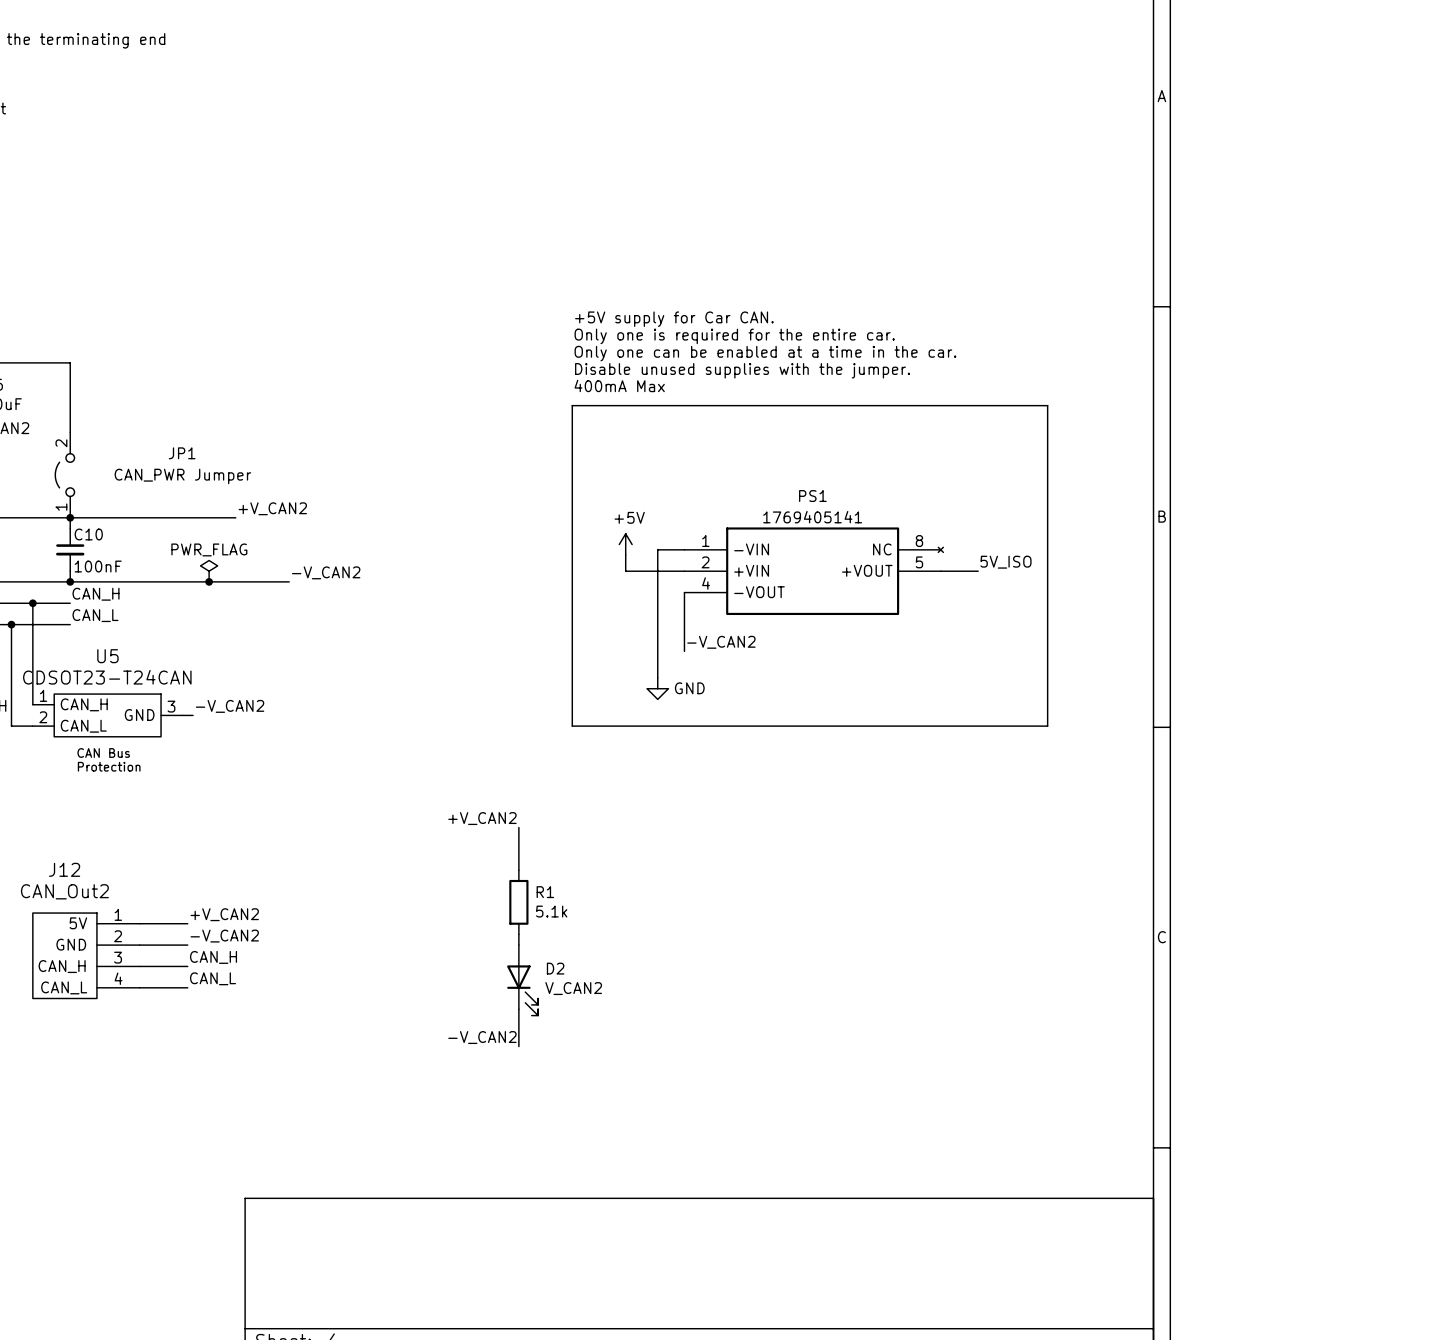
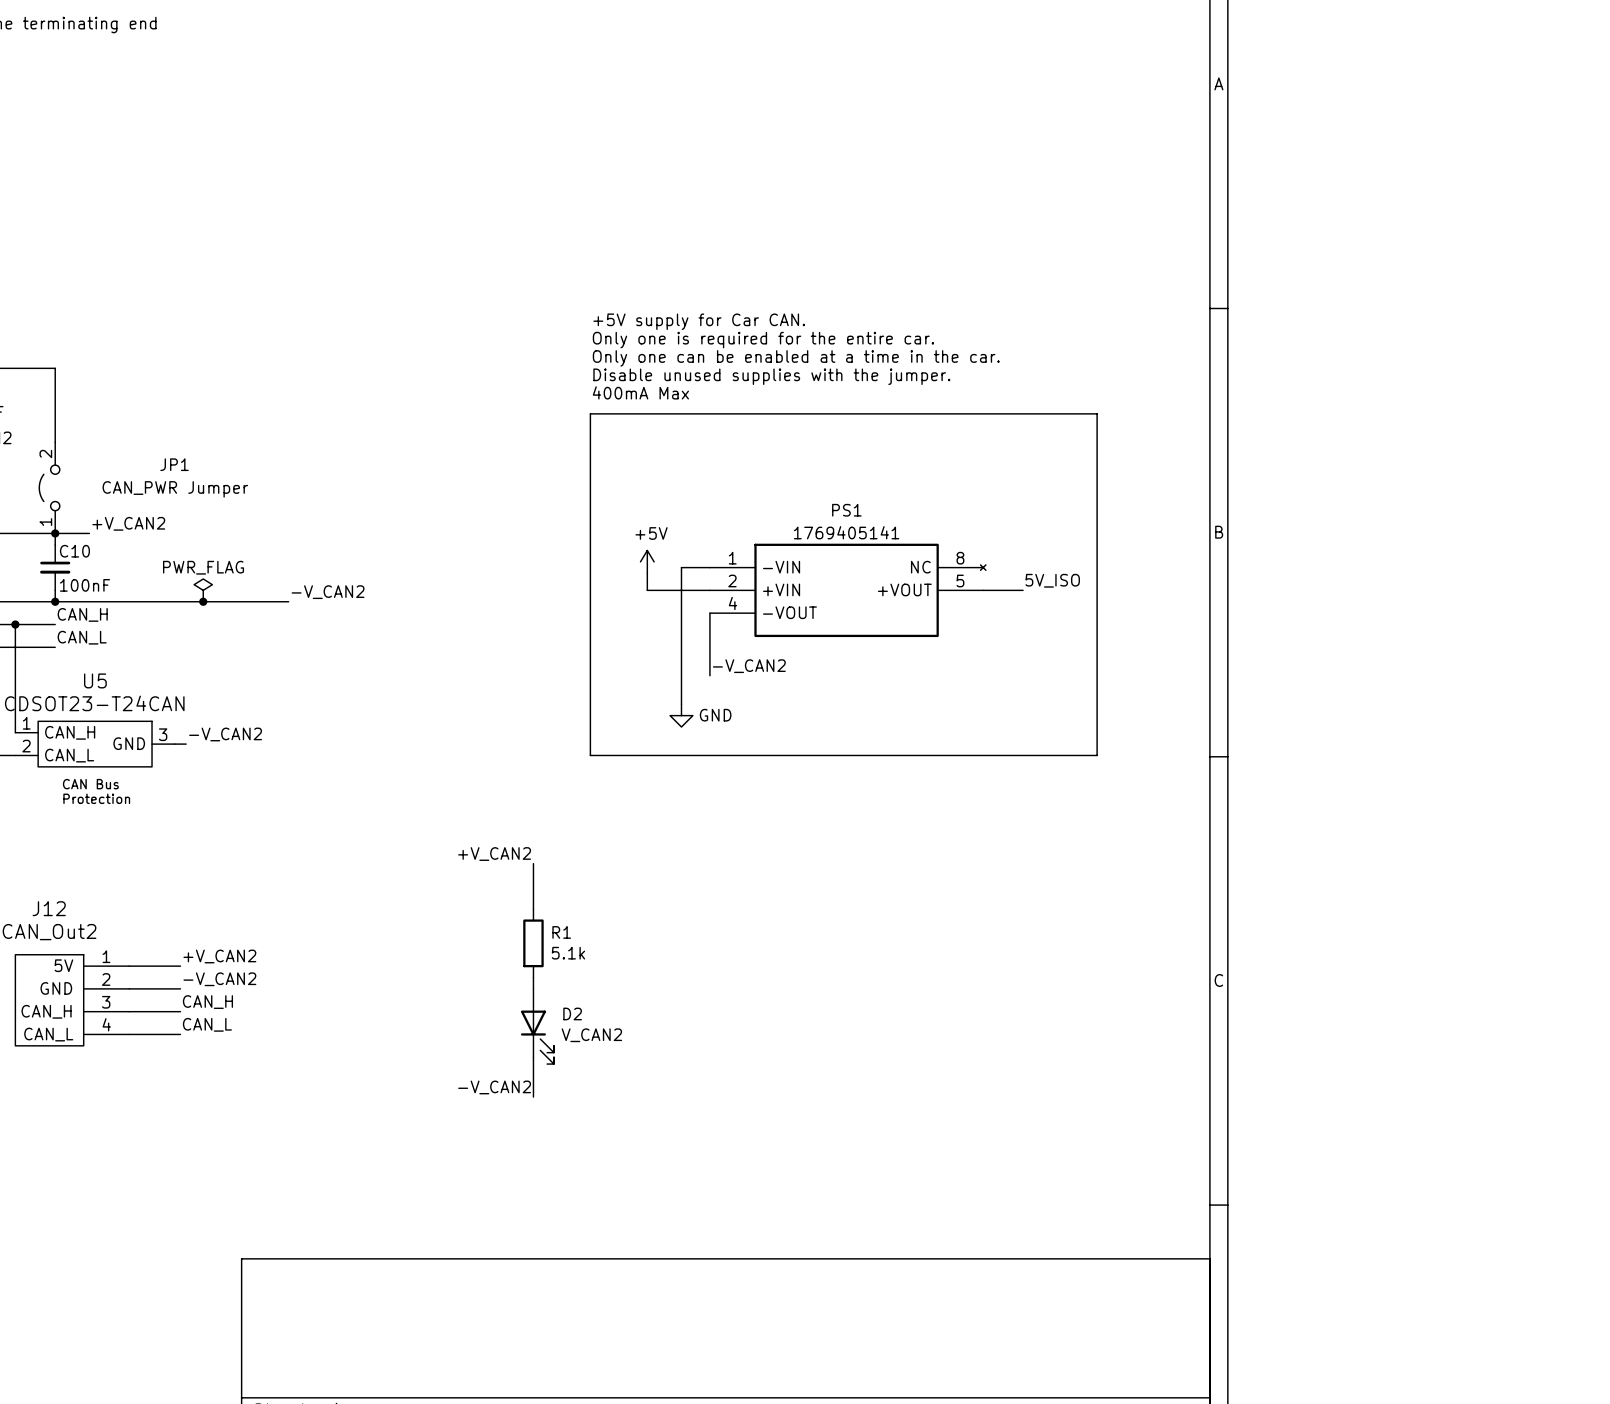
label position: +V_CAN2 (272, 508) -> +V_CAN2 (128, 523)
wire: (102, 517) (235, 517) -> none

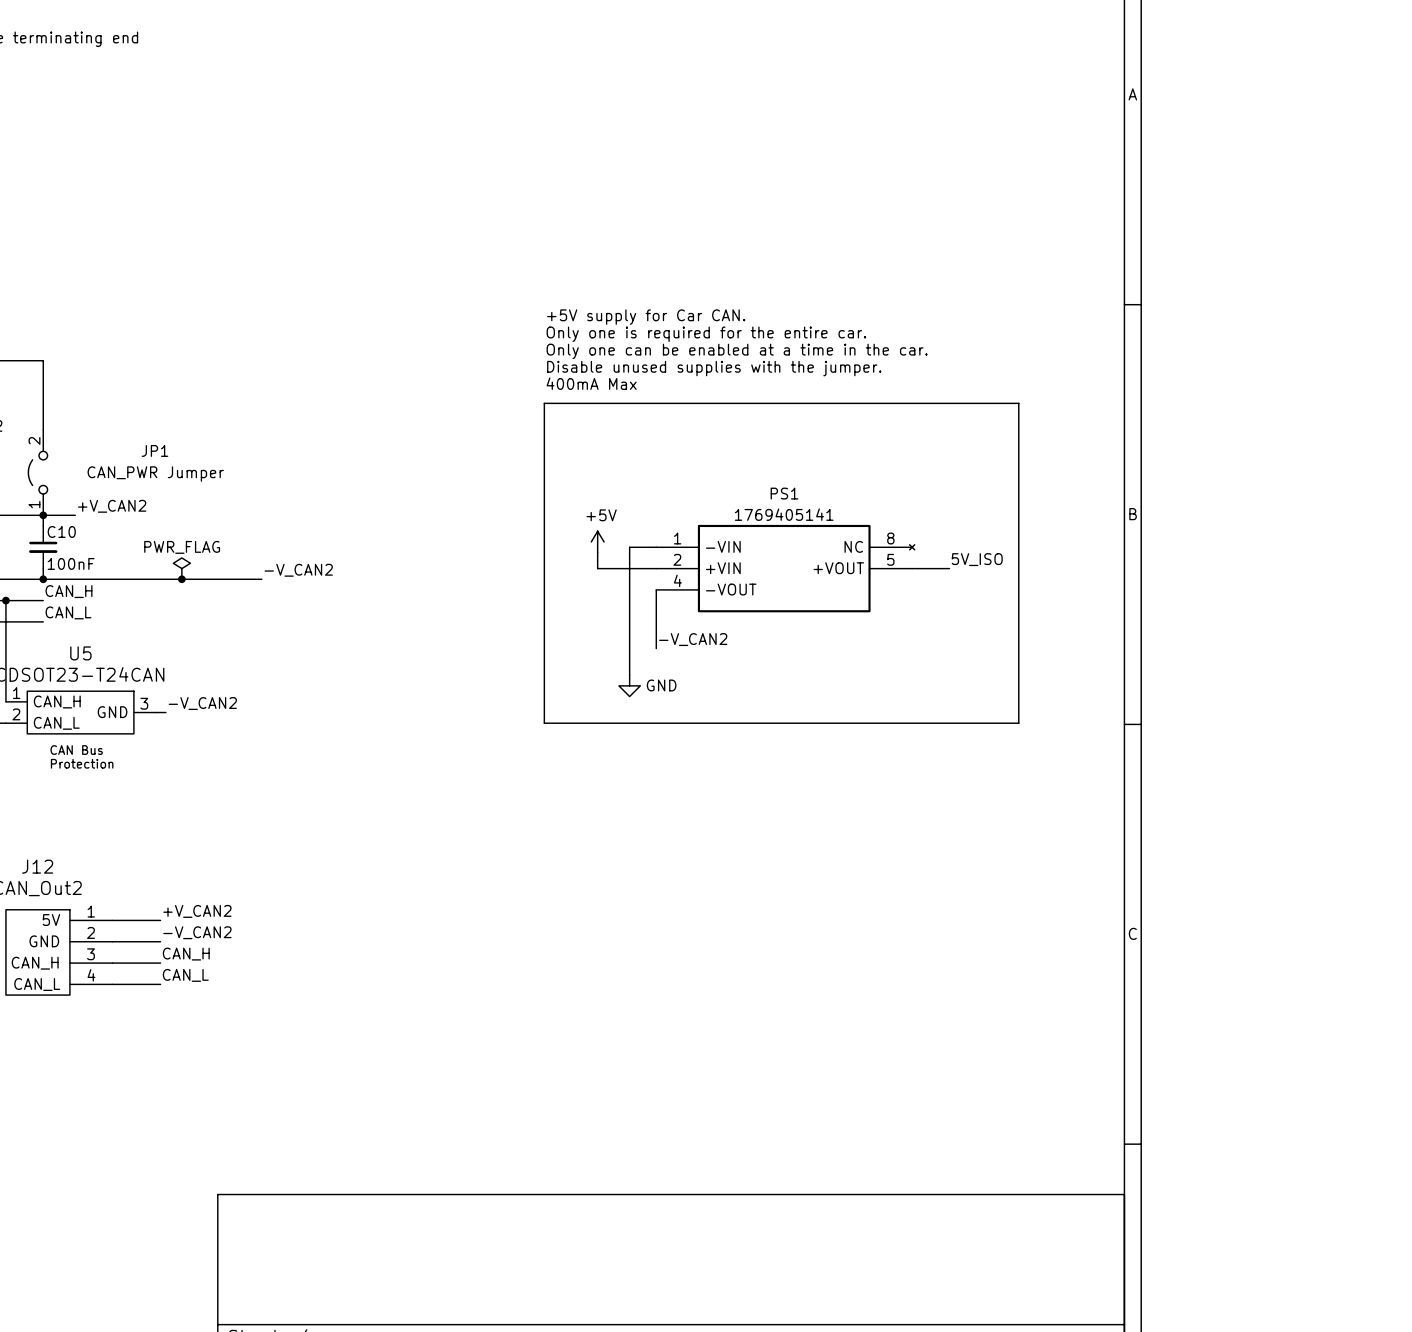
label: +V_CAN2 (494, 854) -> none
wire: (533, 863) (533, 909) -> none
R1: 5.1k (533, 943) -> none
wire: (533, 977) (533, 988) -> none
D2: V_CAN2 (537, 1026) -> none
wire: (533, 1057) (533, 1097) -> none
label: -V_CAN2 (494, 1087) -> none

